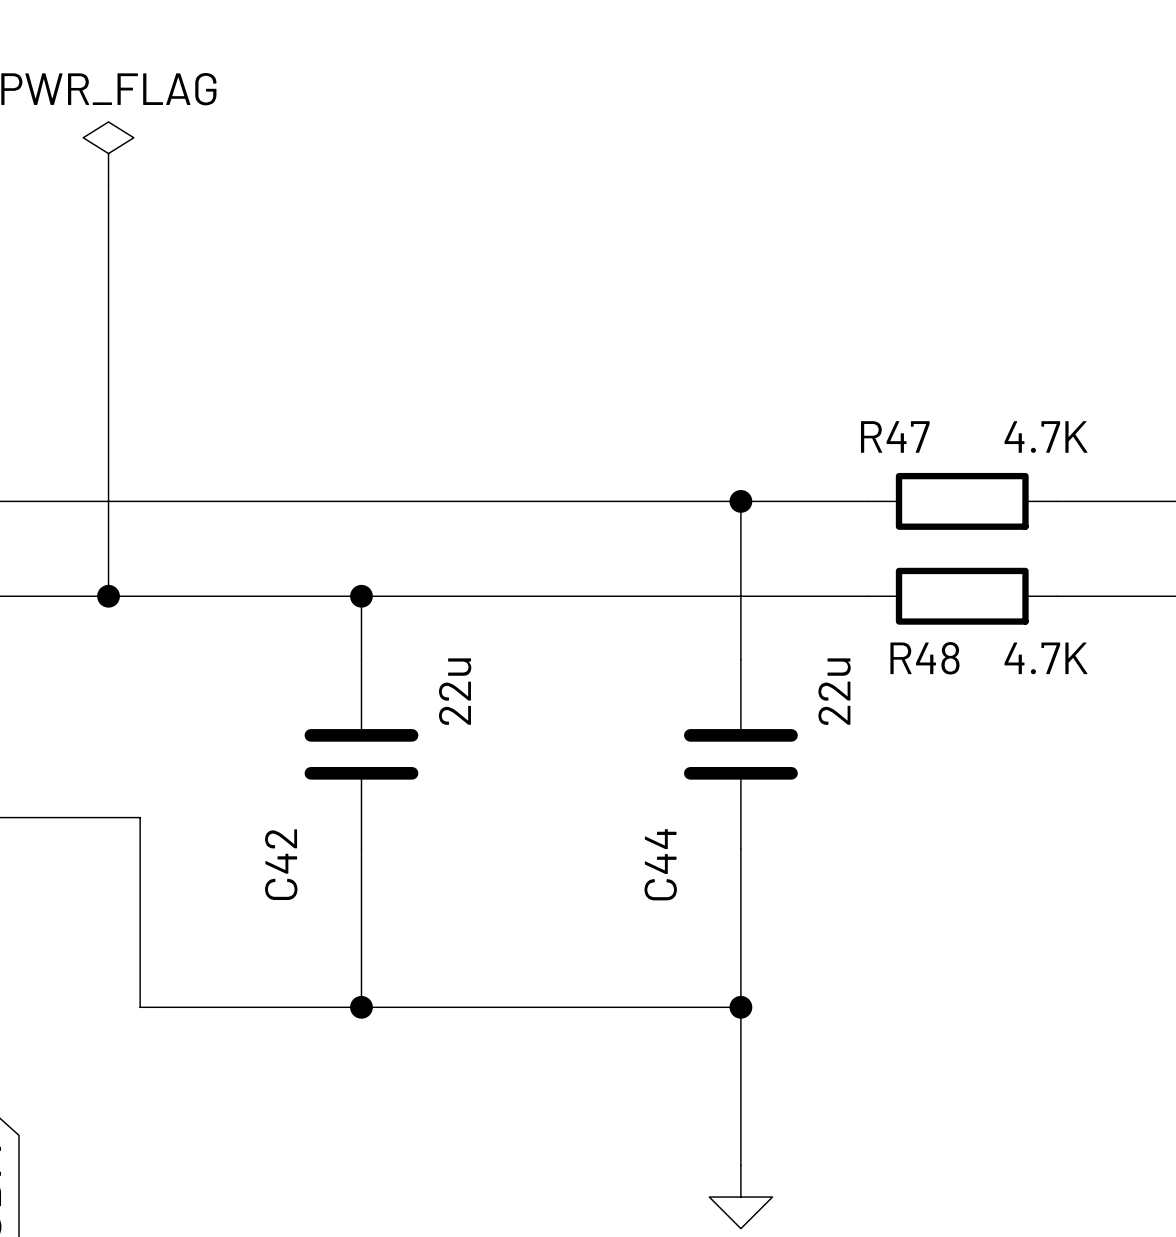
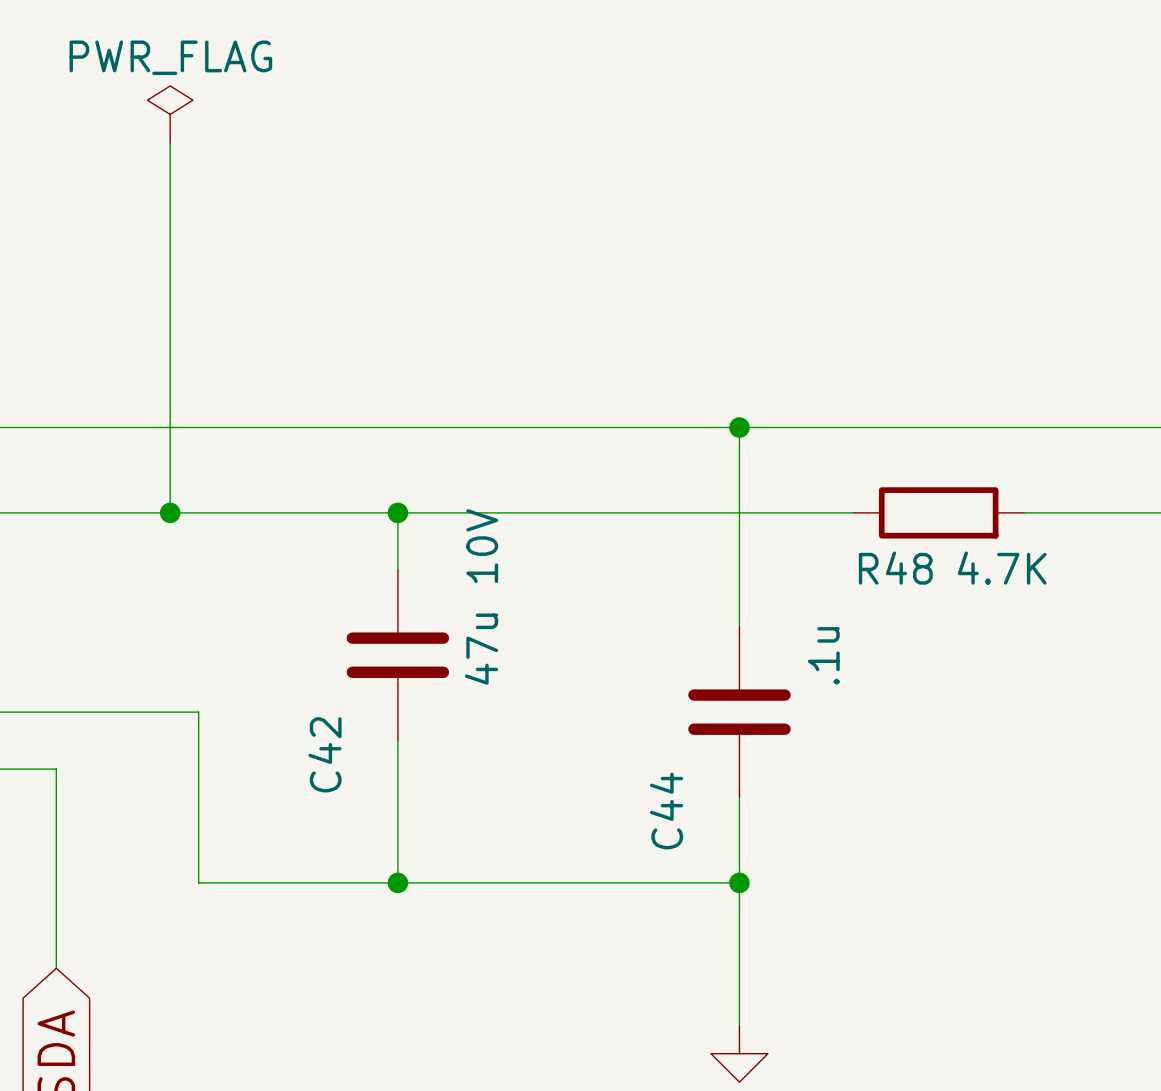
wire: none -> (853, 427) (1024, 427)
R47: 4.7K (962, 501) -> none
C42 value: 22u (455, 691) -> 47u 10V (481, 596)
C44 value: 22u (834, 691) -> .1u (823, 655)
C44 position: (740, 754) -> (739, 712)

